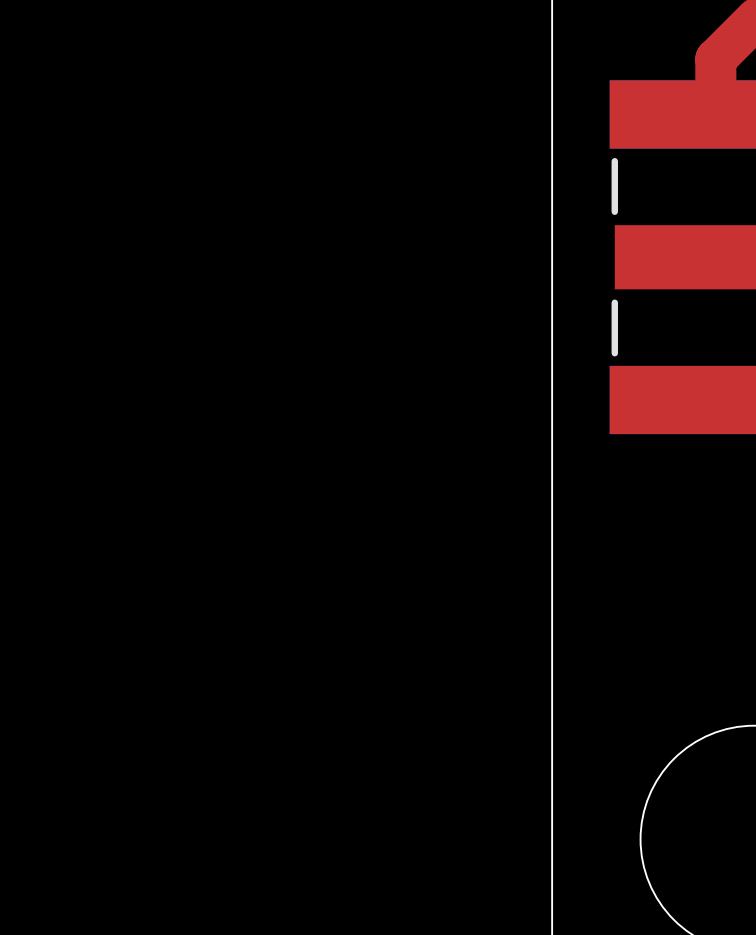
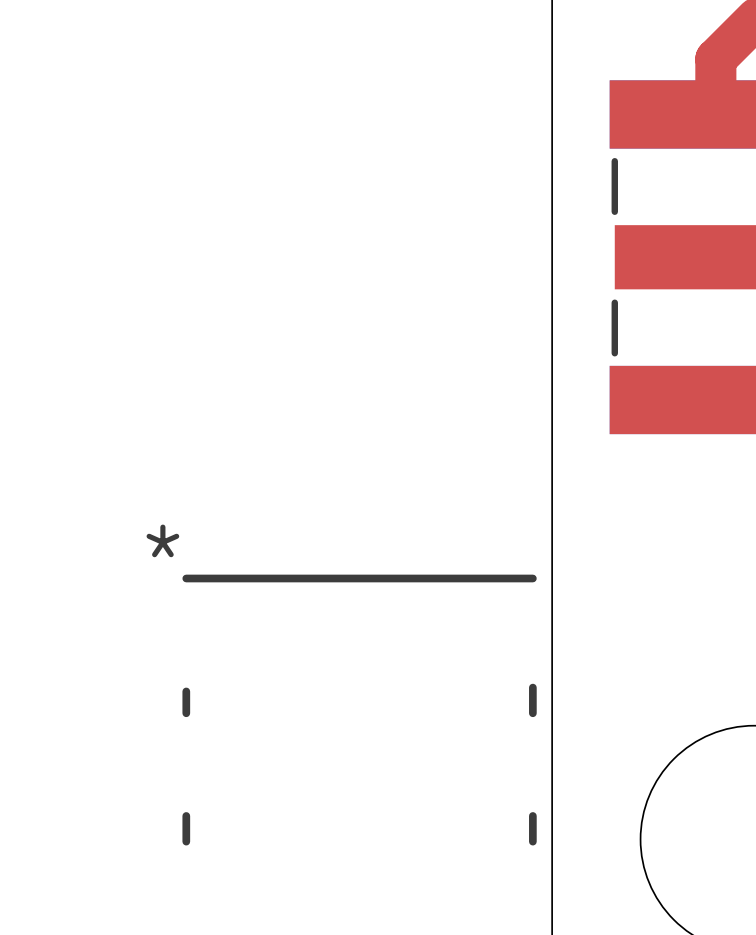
text: none -> * (162, 540)
line: none -> (186, 578) (532, 578)
line: none -> (532, 687) (532, 713)
line: none -> (186, 691) (186, 713)
line: none -> (186, 815) (186, 841)
line: none -> (532, 815) (532, 841)

